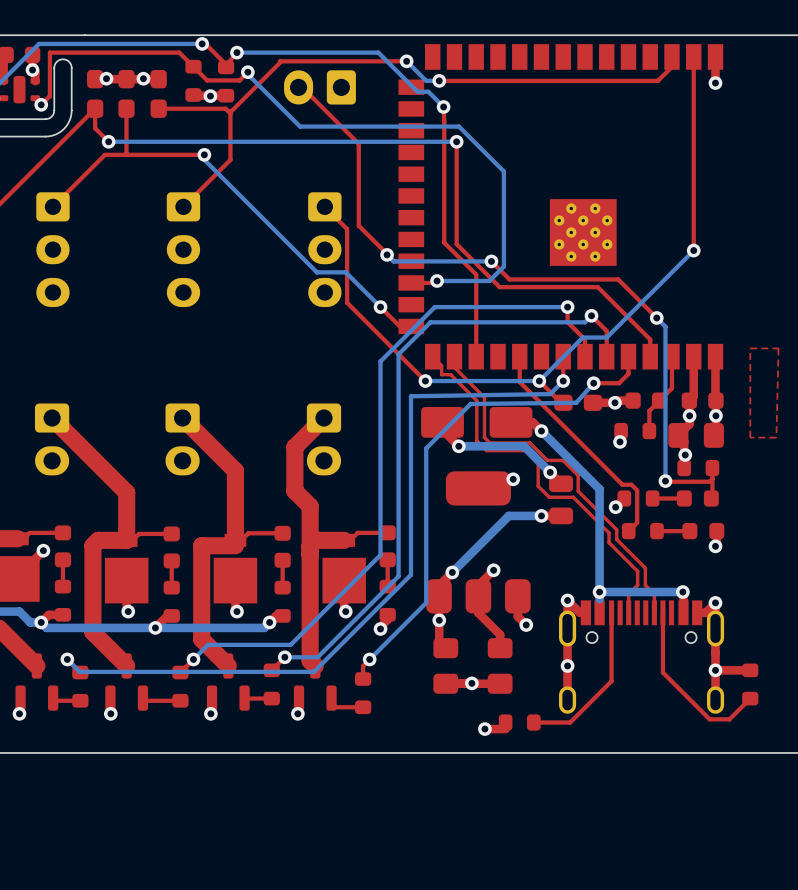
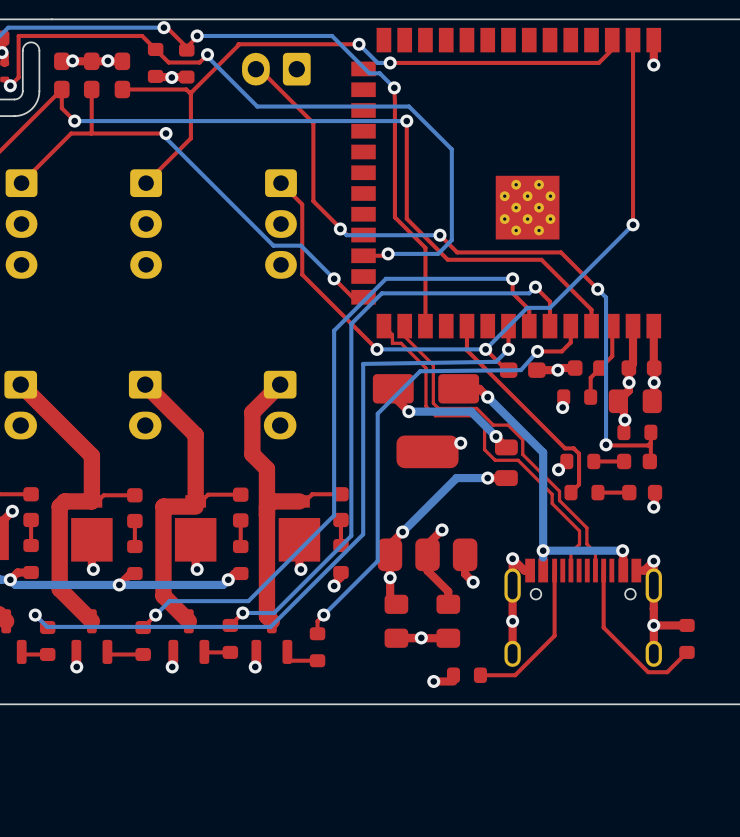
top zone outline: (778, 348) (776, 437) (750, 437) (750, 348) (778, 348) -> none

